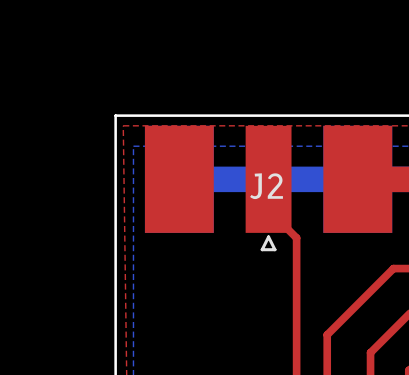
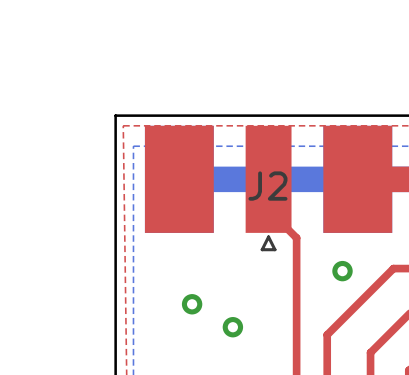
via: none -> (342, 271)
via: none -> (192, 304)
via: none -> (232, 327)

